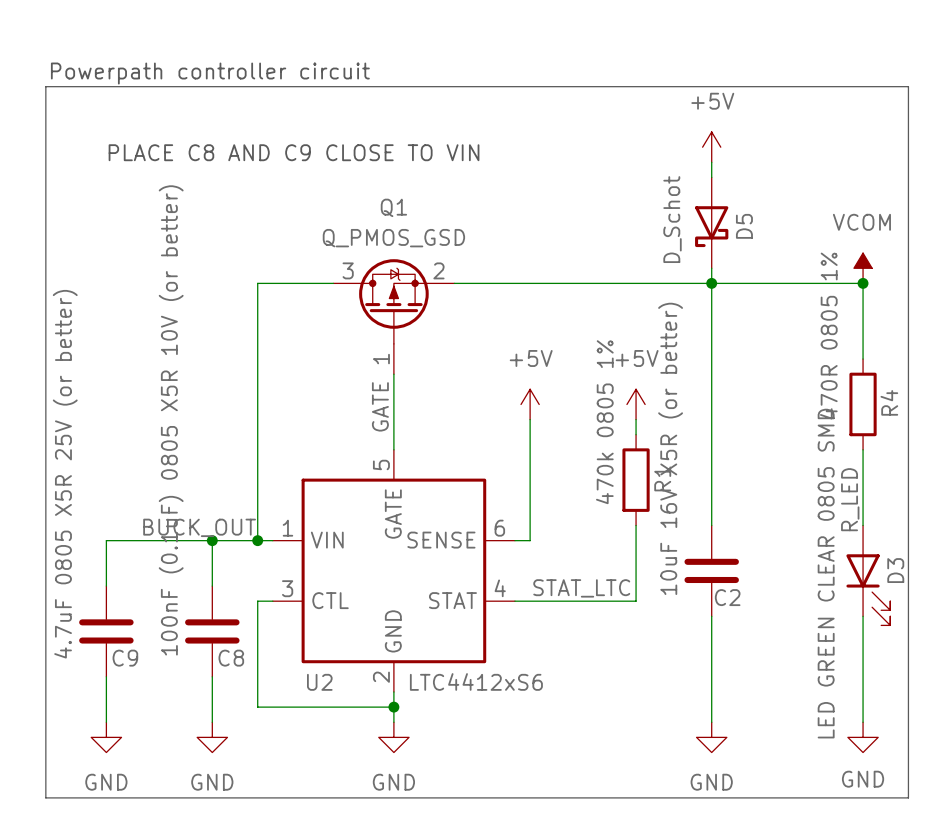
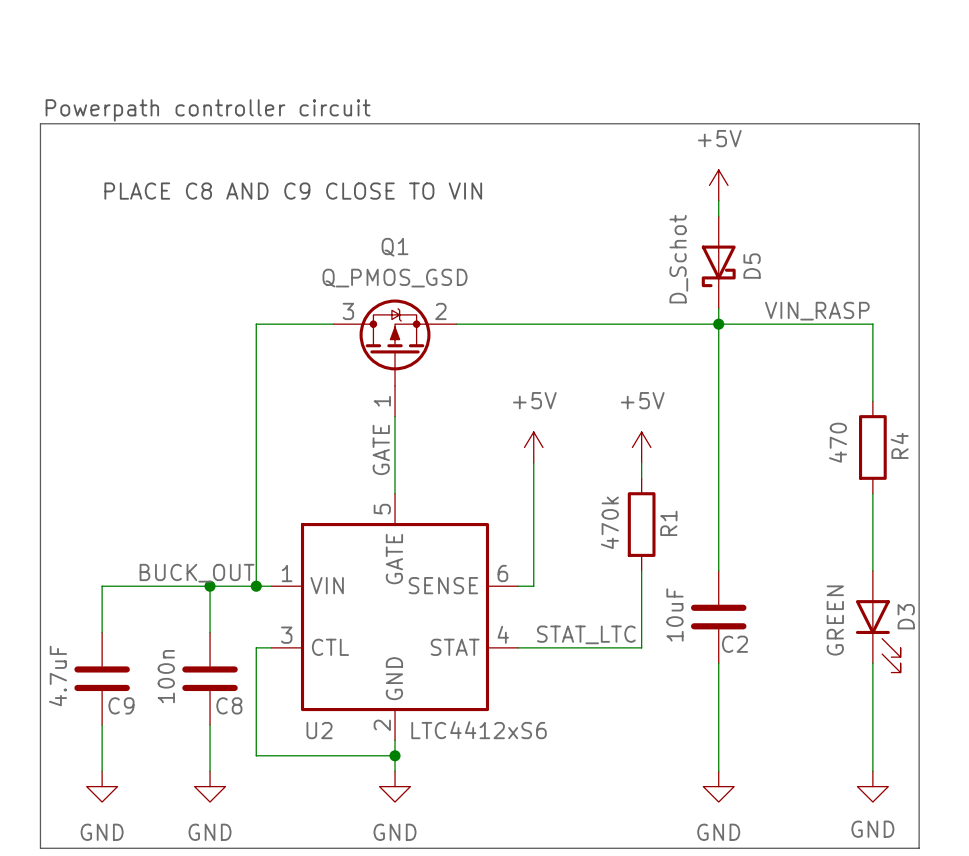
power symbol: VCOM (863, 268) -> none
label: none -> VIN_RASP (817, 311)
junction: (863, 283) -> none
R4 value: 470R 0805 1% (828, 336) -> 470 (838, 442)
C8 value: 100nF (0.1uF) 0805 X5R 10V (or better) (171, 420) -> 100n (166, 676)
R1 value: 470k 0805 1% (604, 422) -> 470k (609, 522)
C2 value: 10uF 16V X5R (or better) (670, 448) -> 10uF (674, 614)
C9 value: 4.7uF 0805 X5R 25V (or better) (65, 474) -> 4.7uF (58, 676)
label: R_LED (850, 499) -> none
D3 value: LED GREEN CLEAR 0805 SMD (826, 573) -> GREEN (835, 620)

